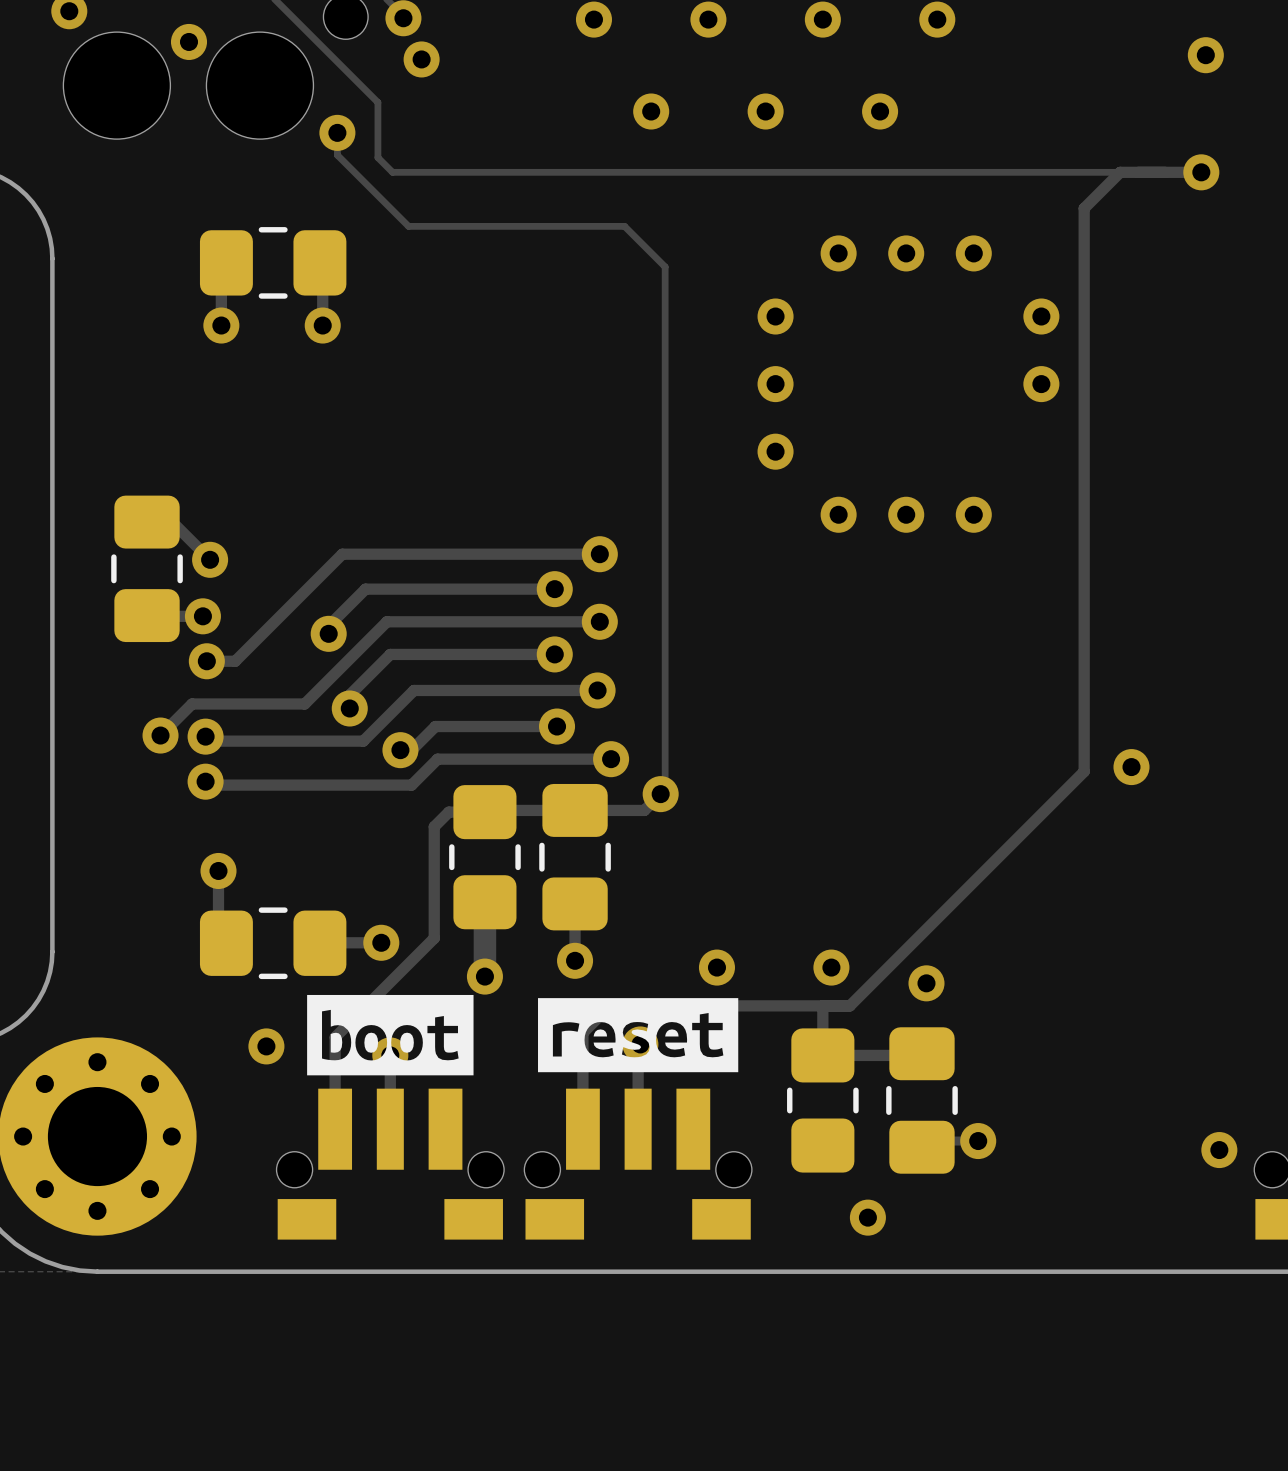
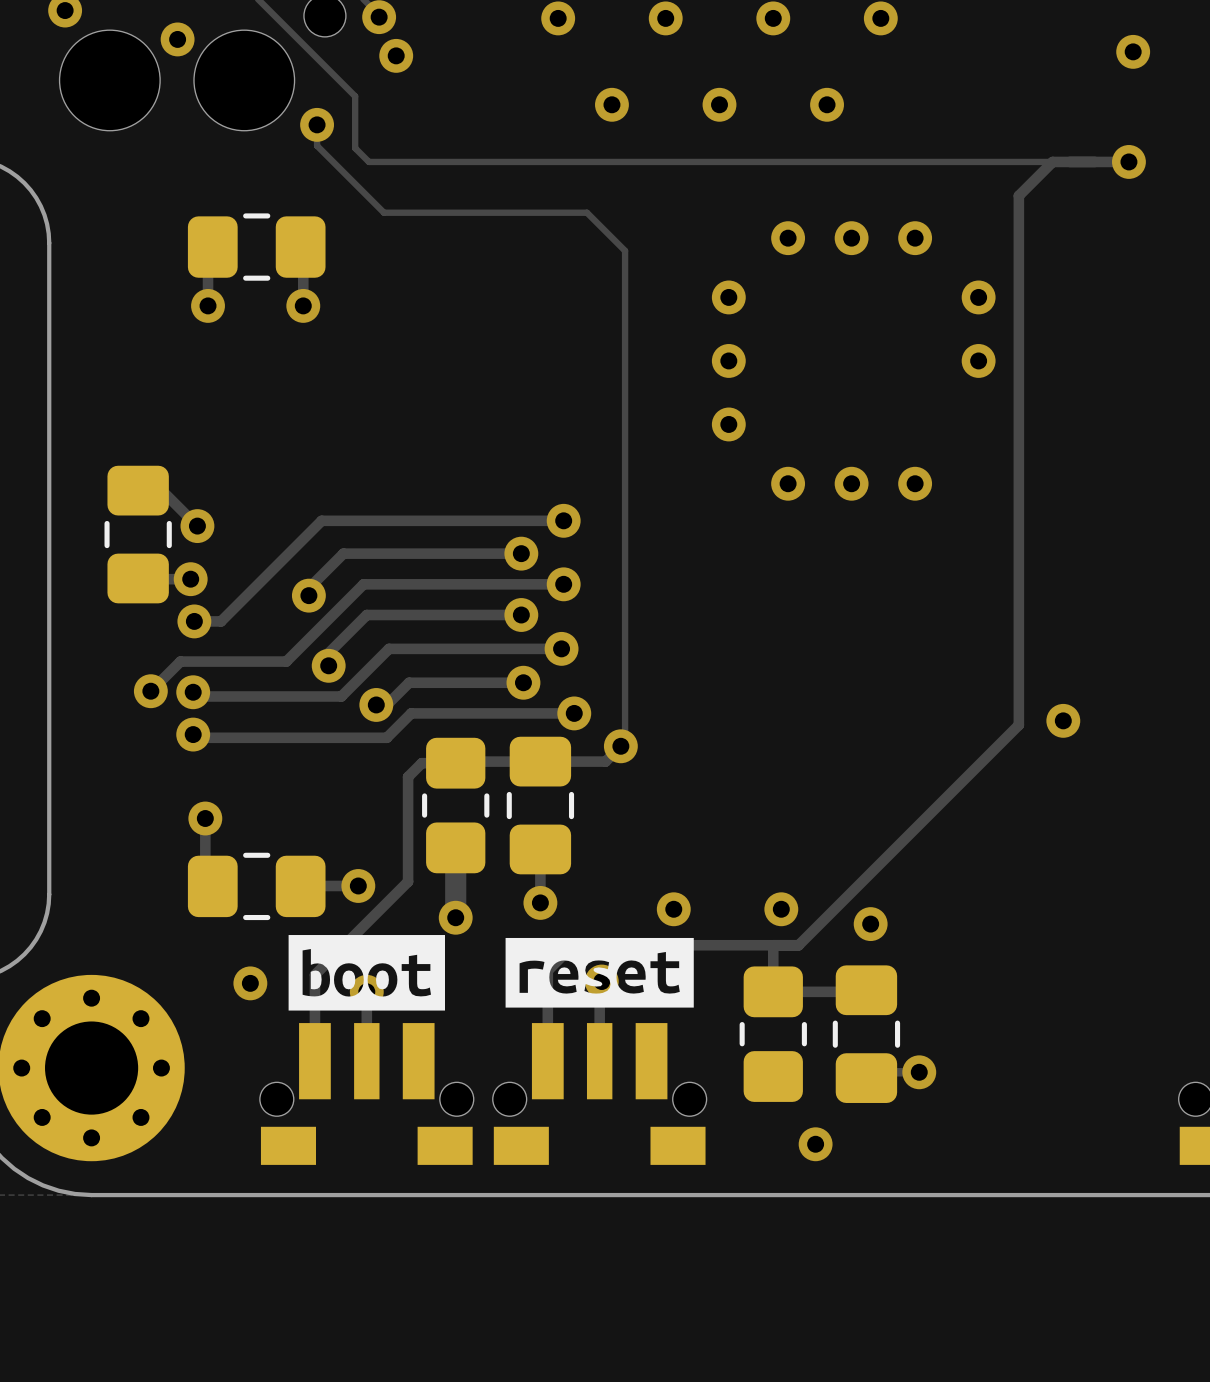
via: (1219, 1150) -> none

